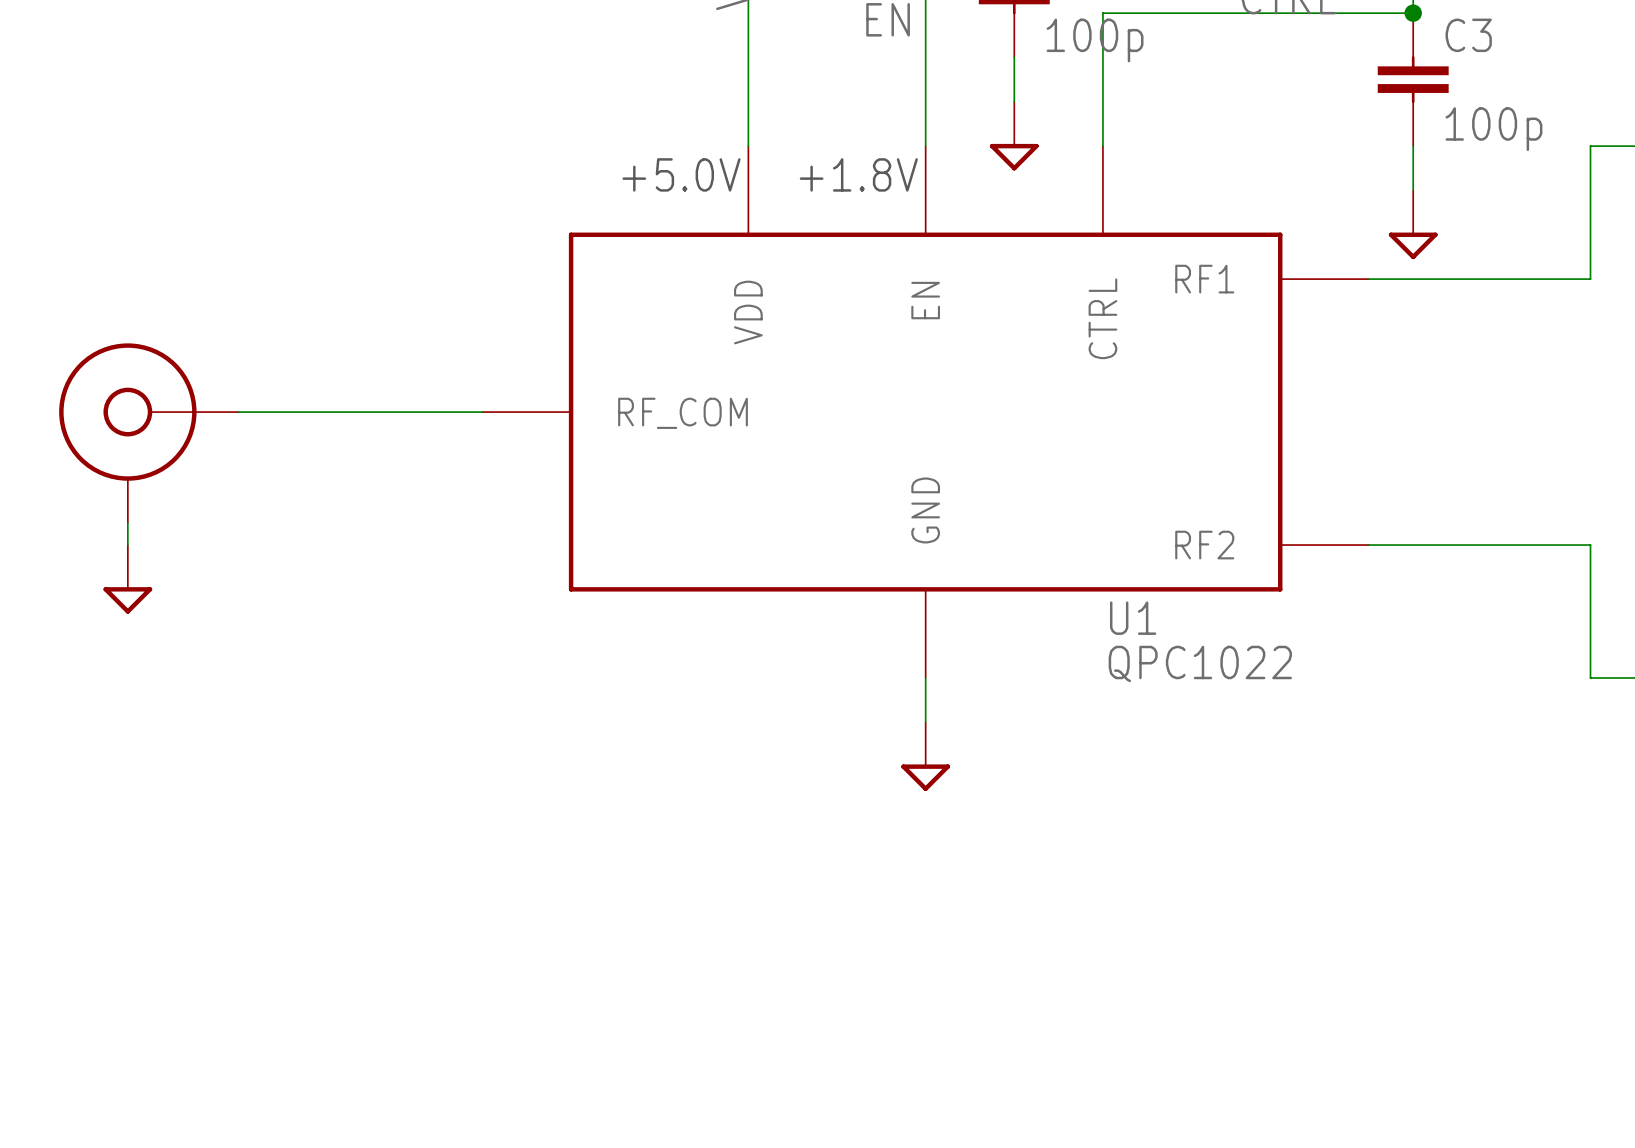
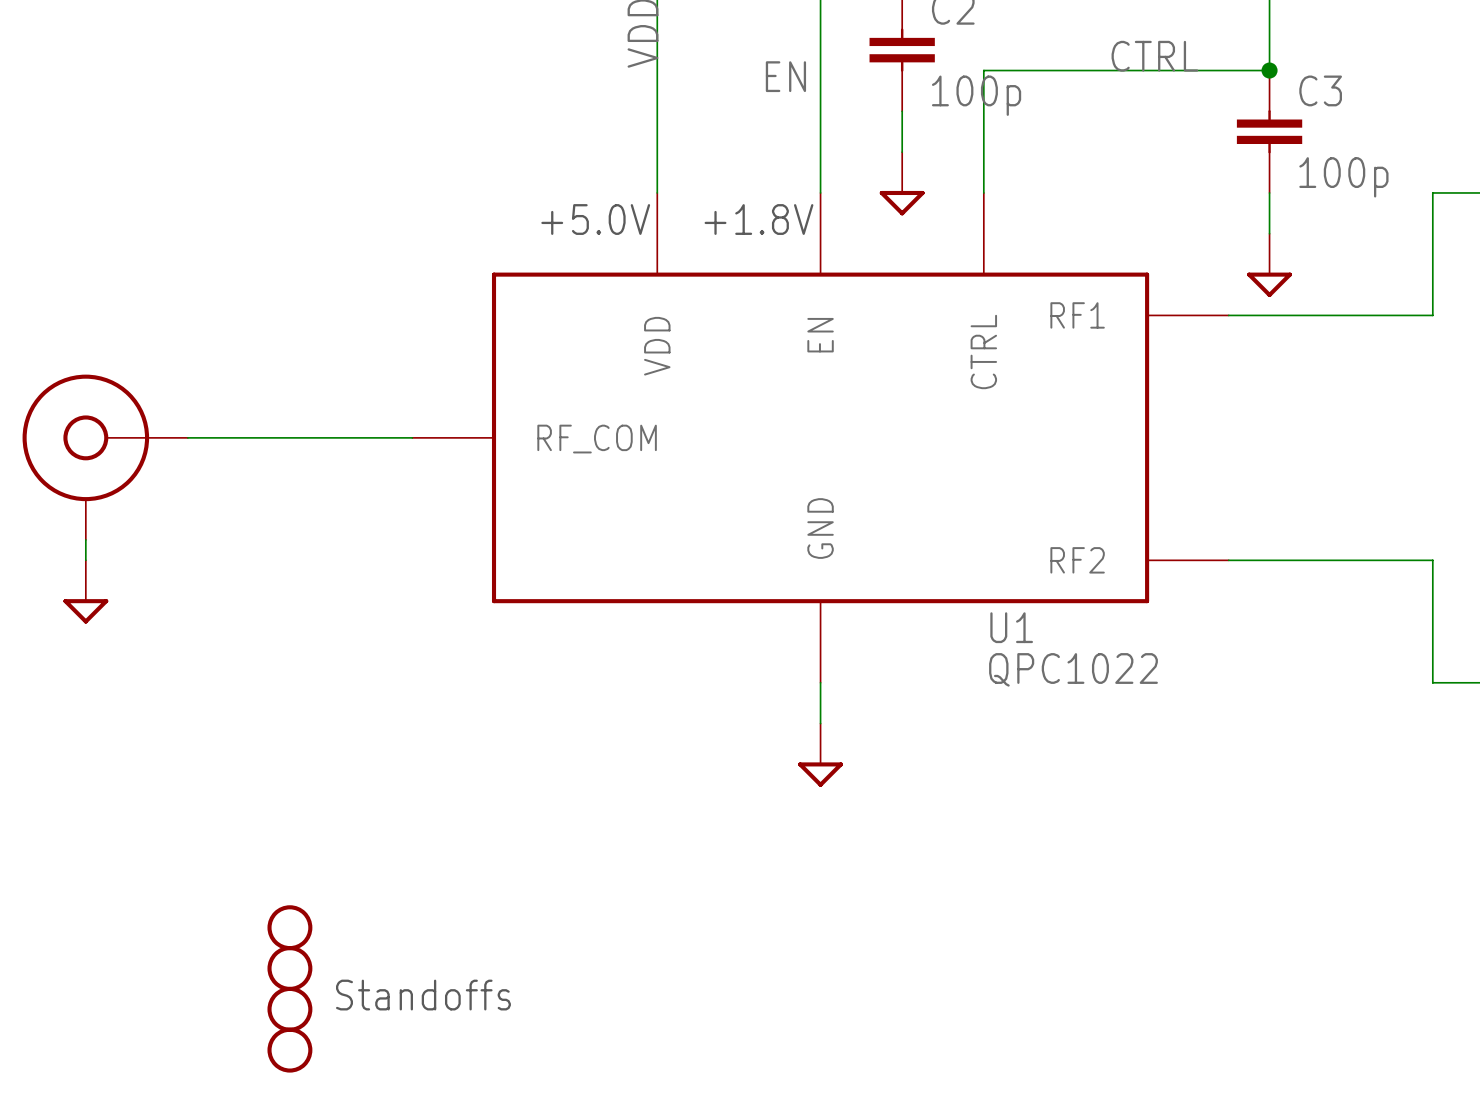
part: none -> (289, 927)
part: none -> (289, 968)
text: none -> Standoffs (423, 995)
part: none -> (289, 1009)
part: none -> (289, 1050)

